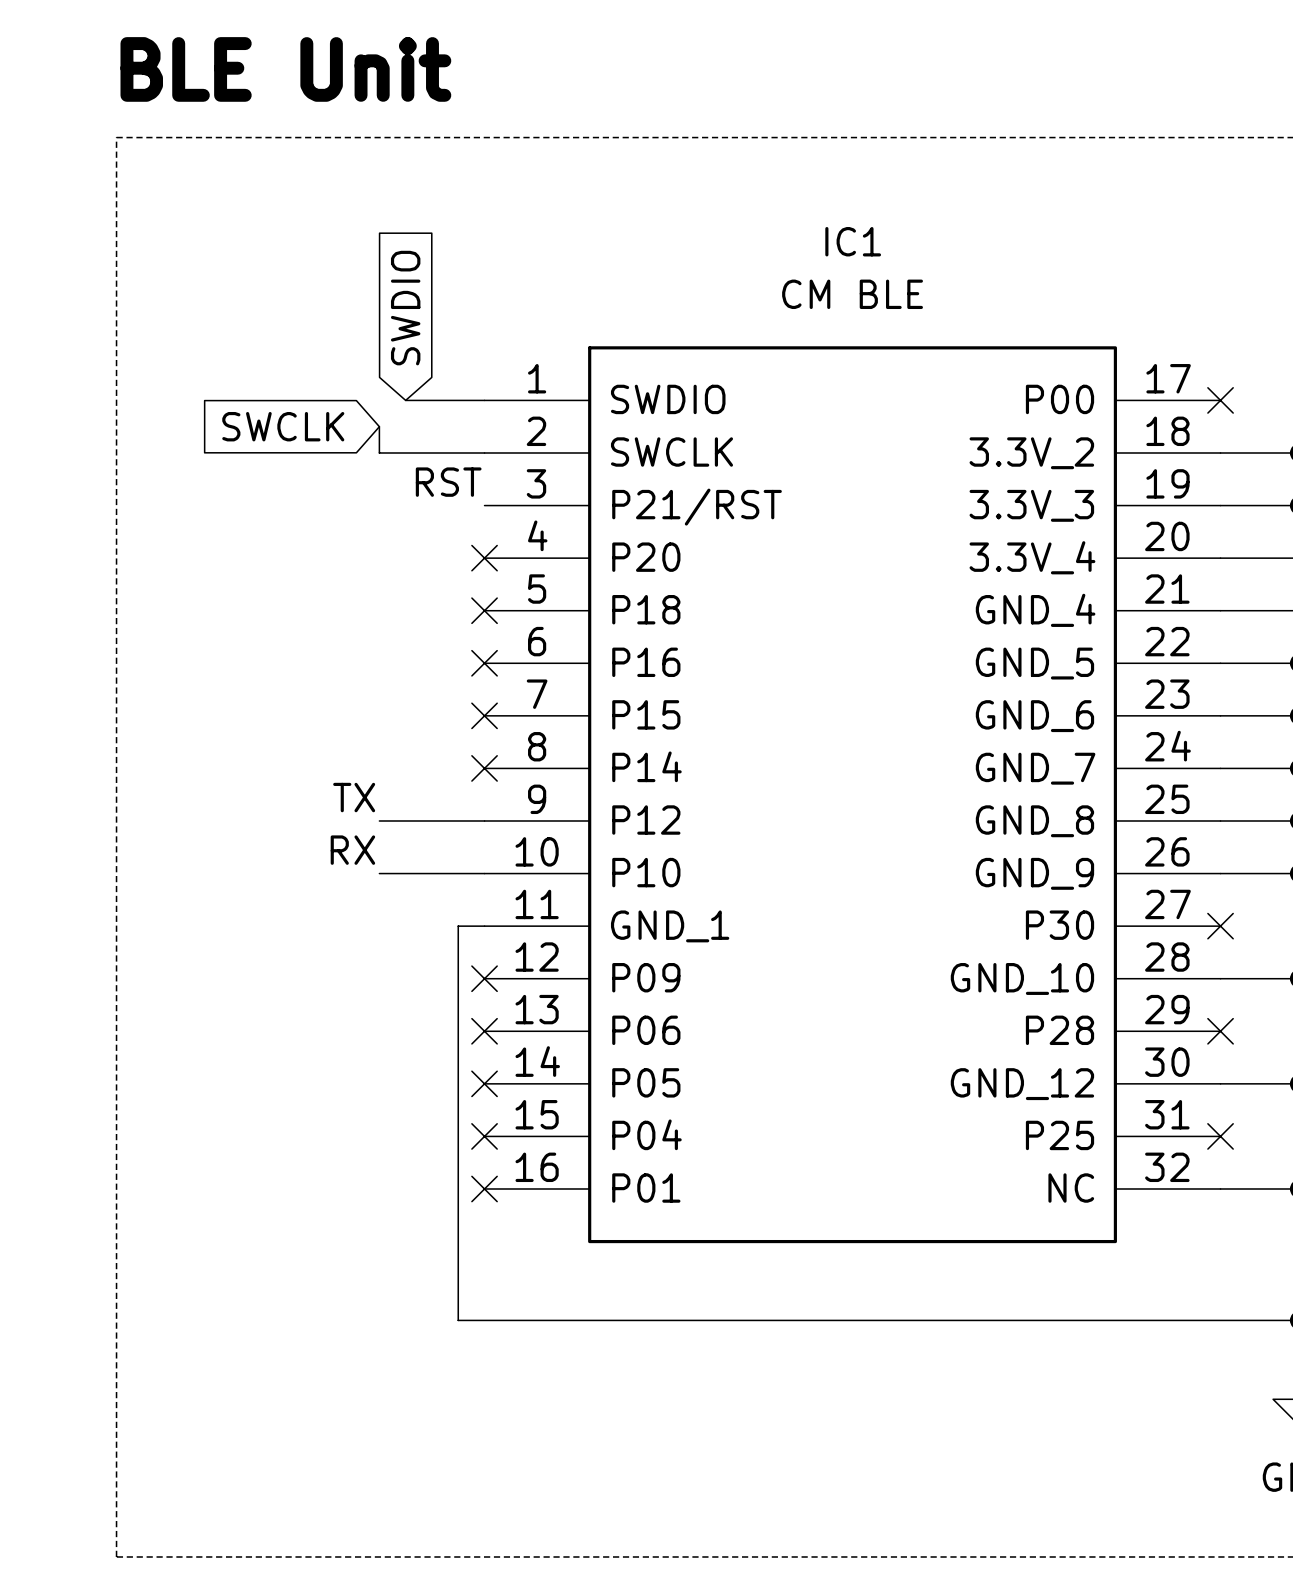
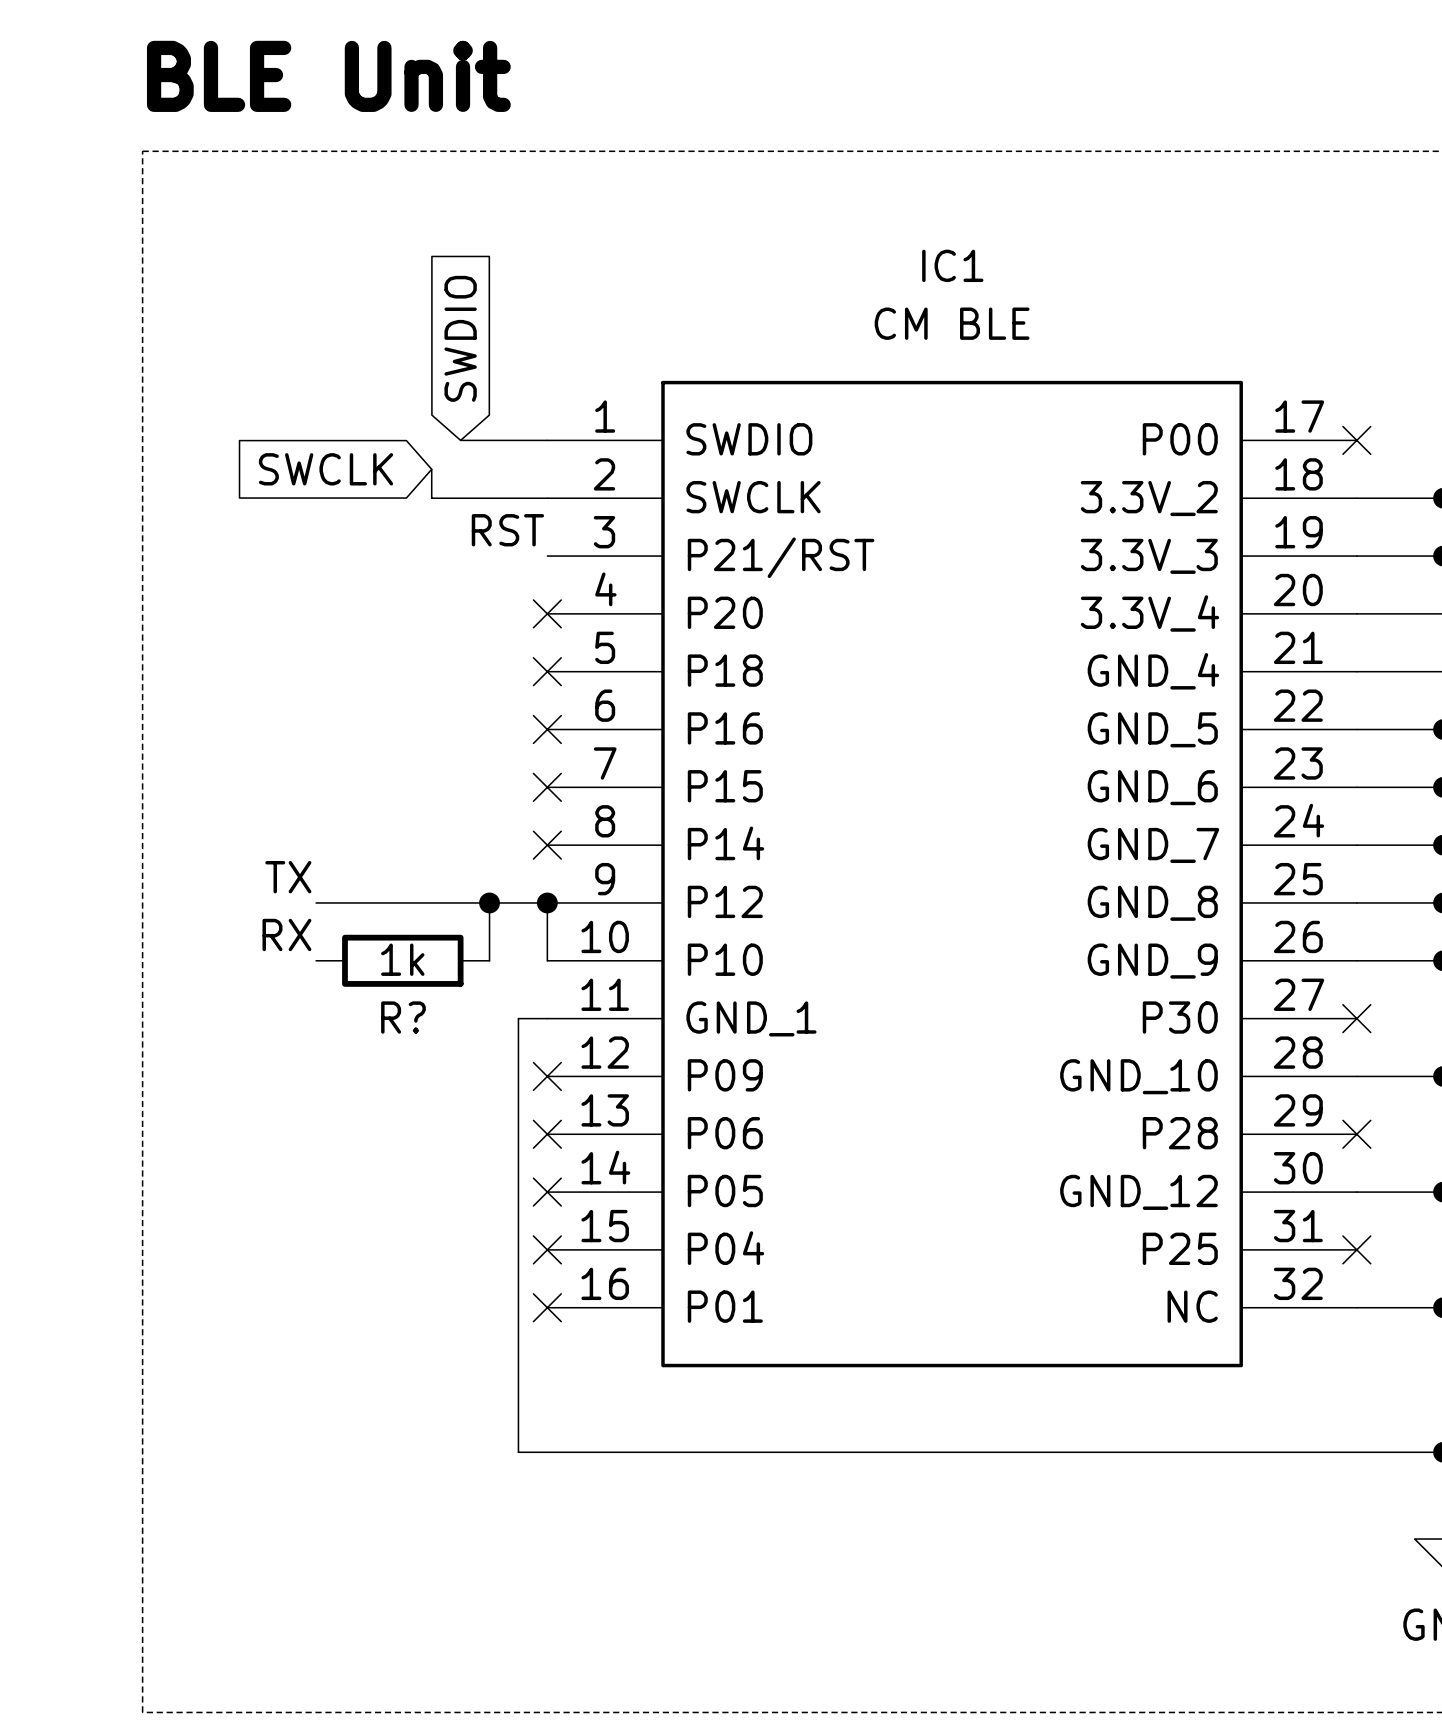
label position: TX (354, 797) -> TX (288, 877)
wire: none -> (316, 902) (431, 902)
wire: none -> (489, 902) (489, 960)
junction: none -> (489, 902)
junction: none -> (547, 902)
label position: RX (352, 850) -> RX (286, 935)
R?: none -> 1k (402, 960)
wire: (379, 873) (484, 873) -> (547, 902) (547, 960)

